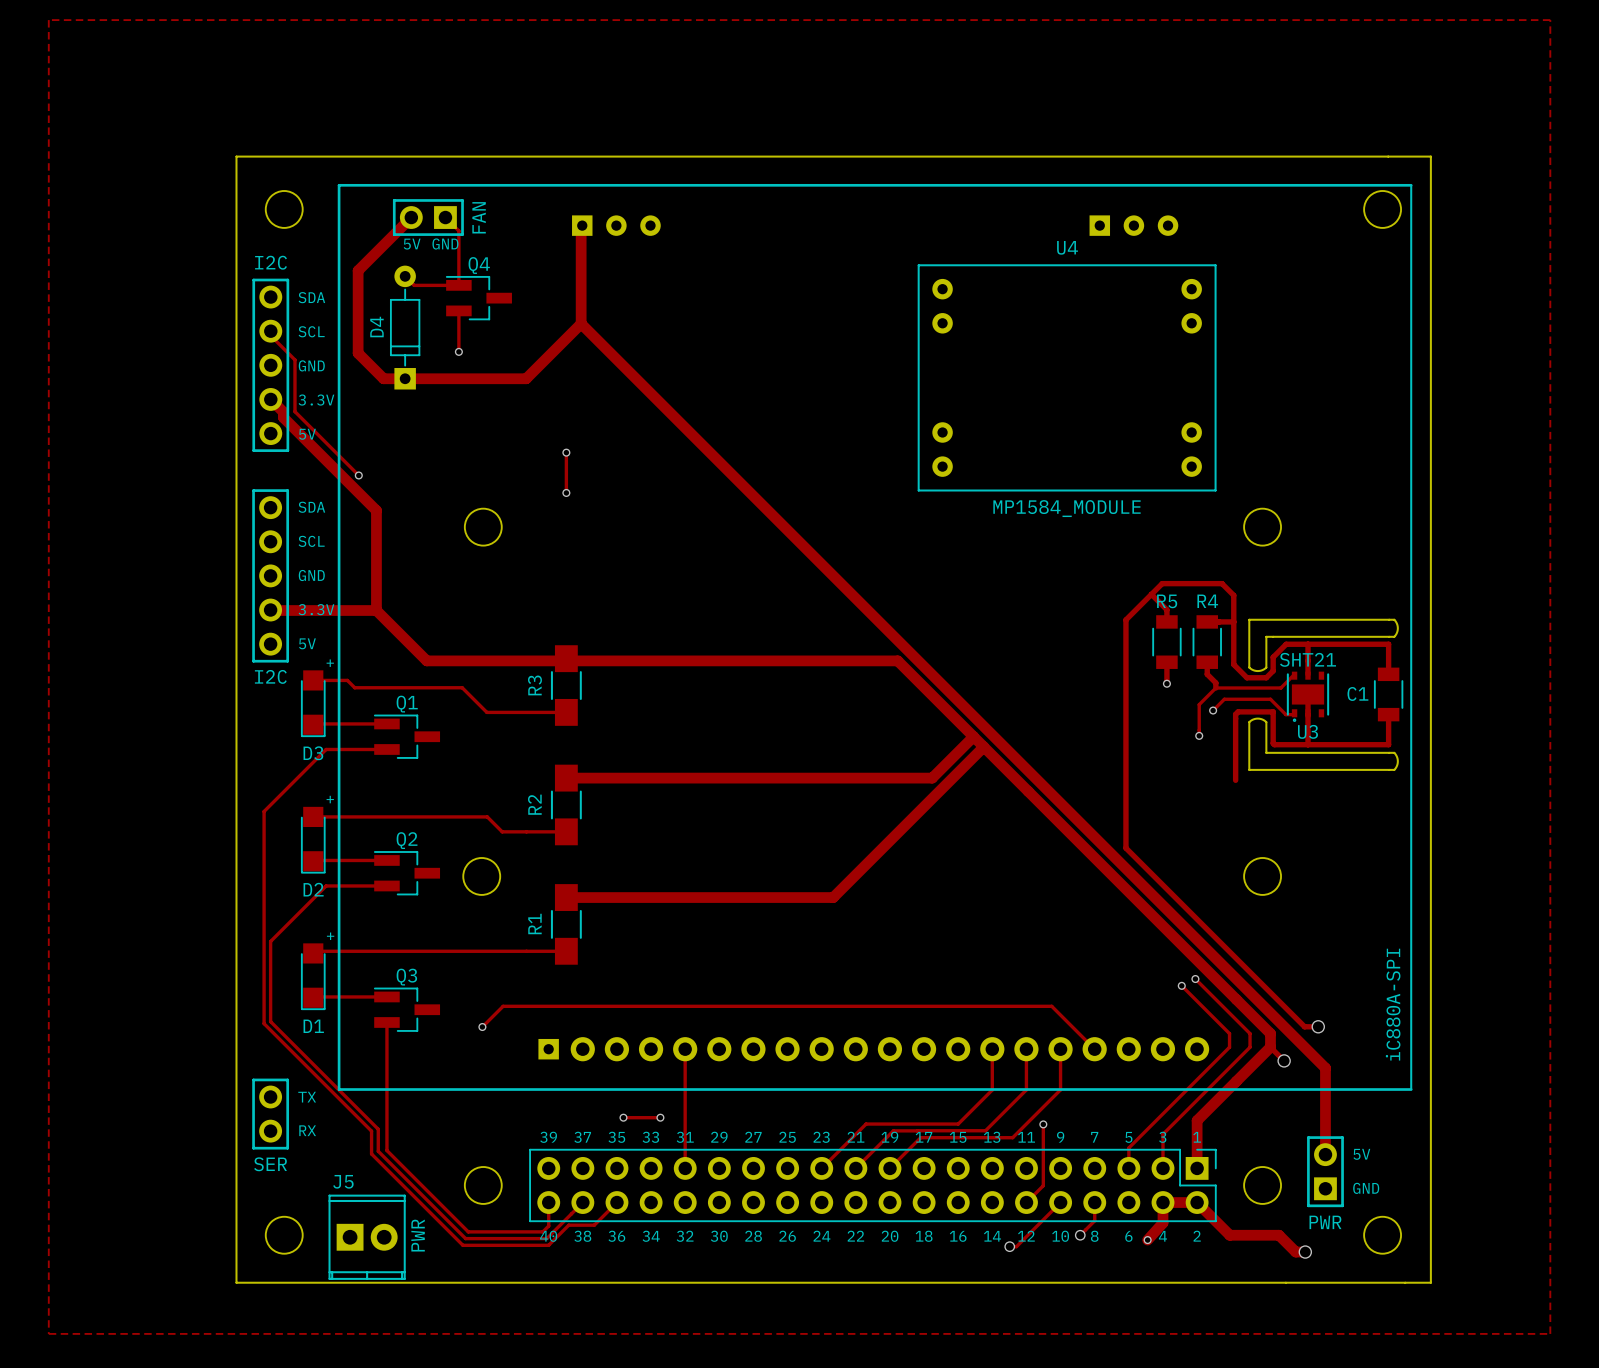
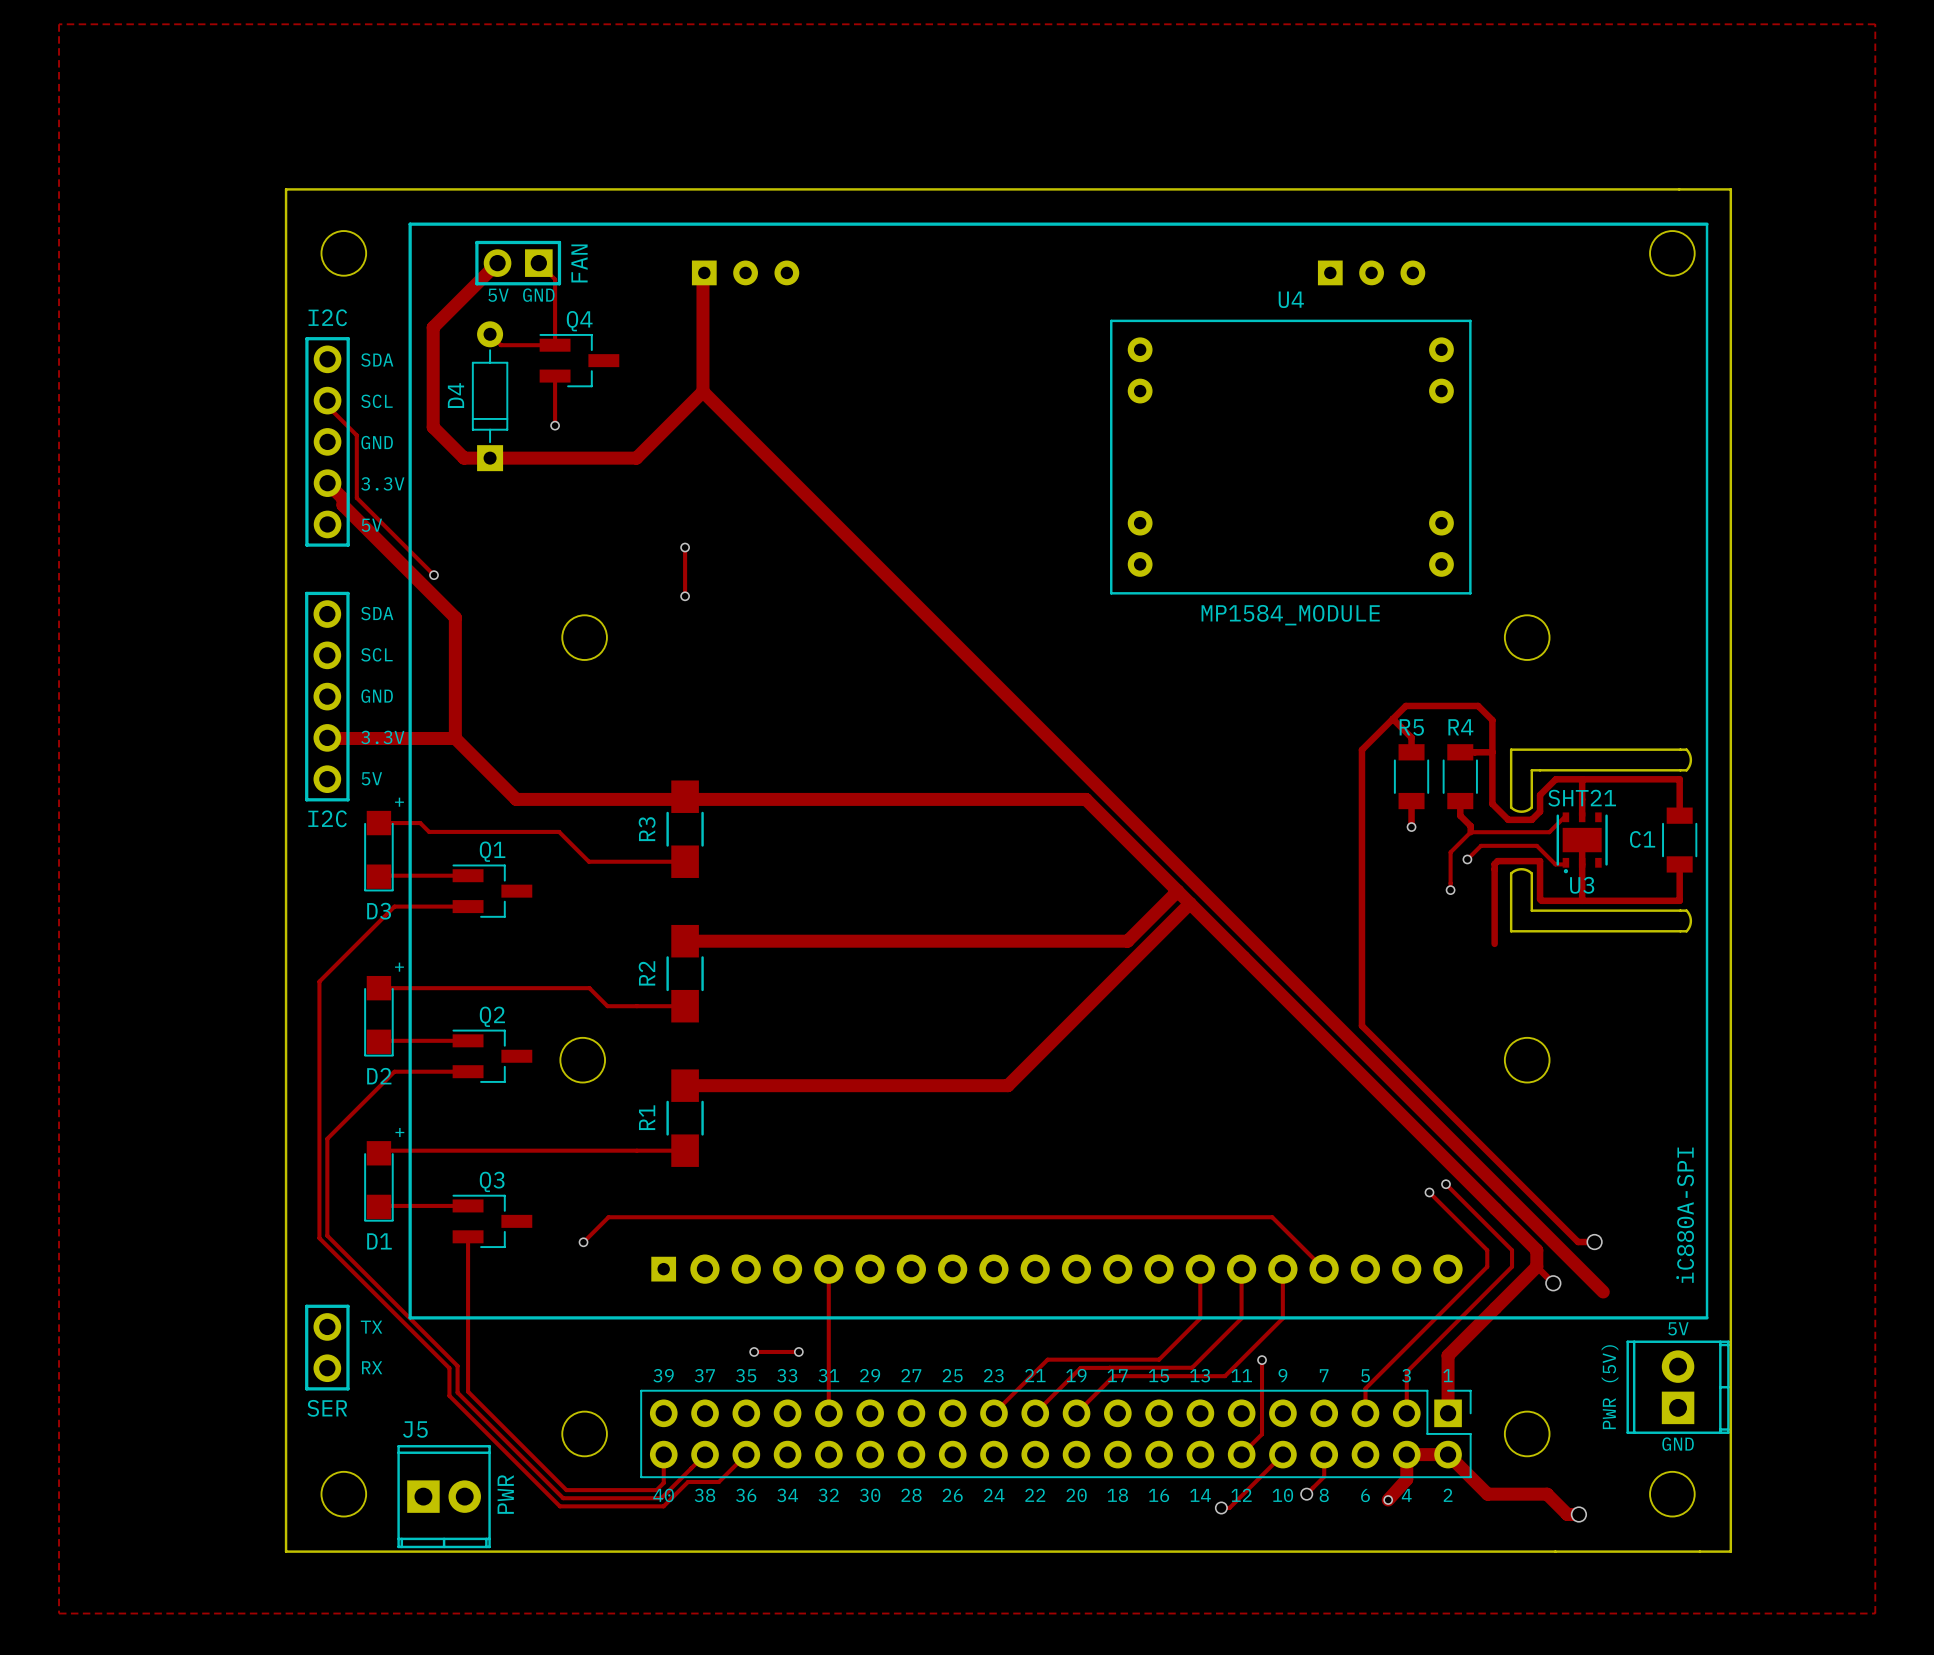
track: (1325, 1068) (1325, 1154) (1322, 1154) -> none
text: none -> PWR (5V) (1610, 1387)
part: none -> (1678, 1387)
text position: 5V (1361, 1154) -> 5V (1678, 1328)
part: PWR (1325, 1171) -> none
text position: GND (1366, 1188) -> GND (1678, 1444)

